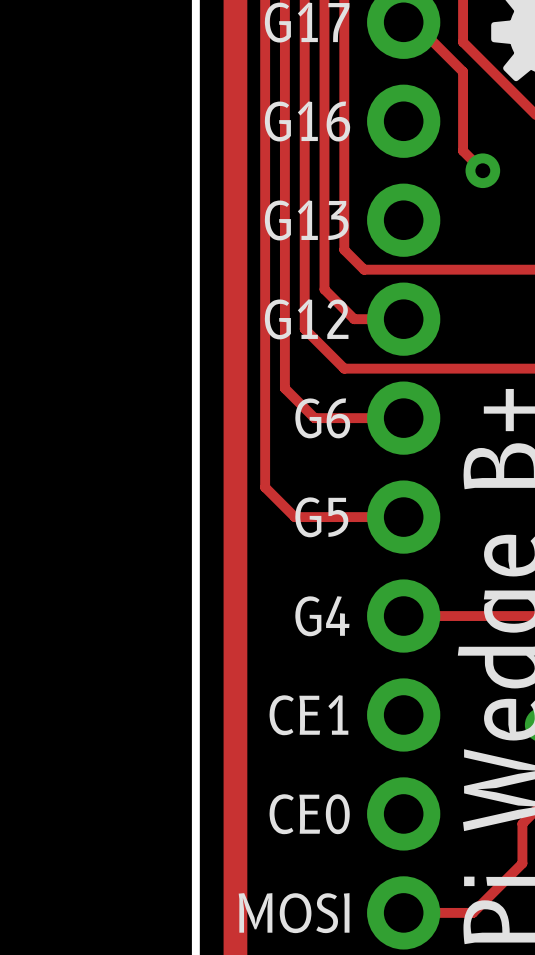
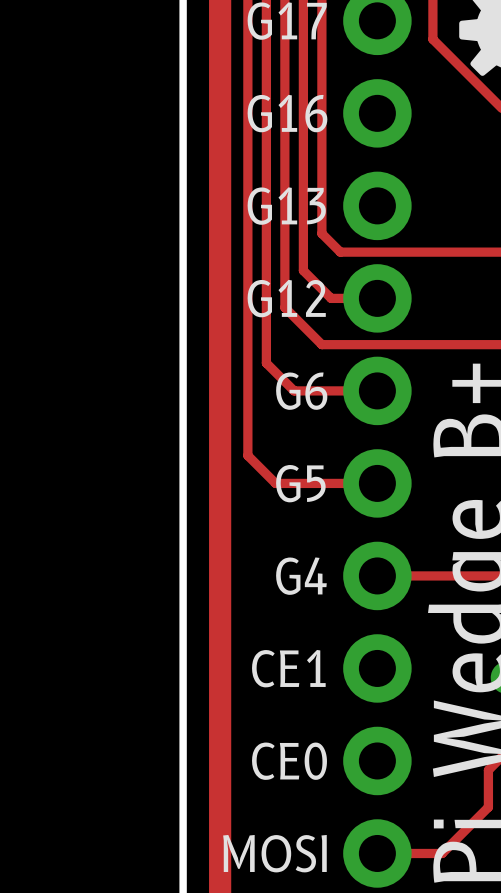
track: (403, 22) (413, 22) (463, 71) (463, 150) (482, 170) -> none
via: (482, 170) -> none

